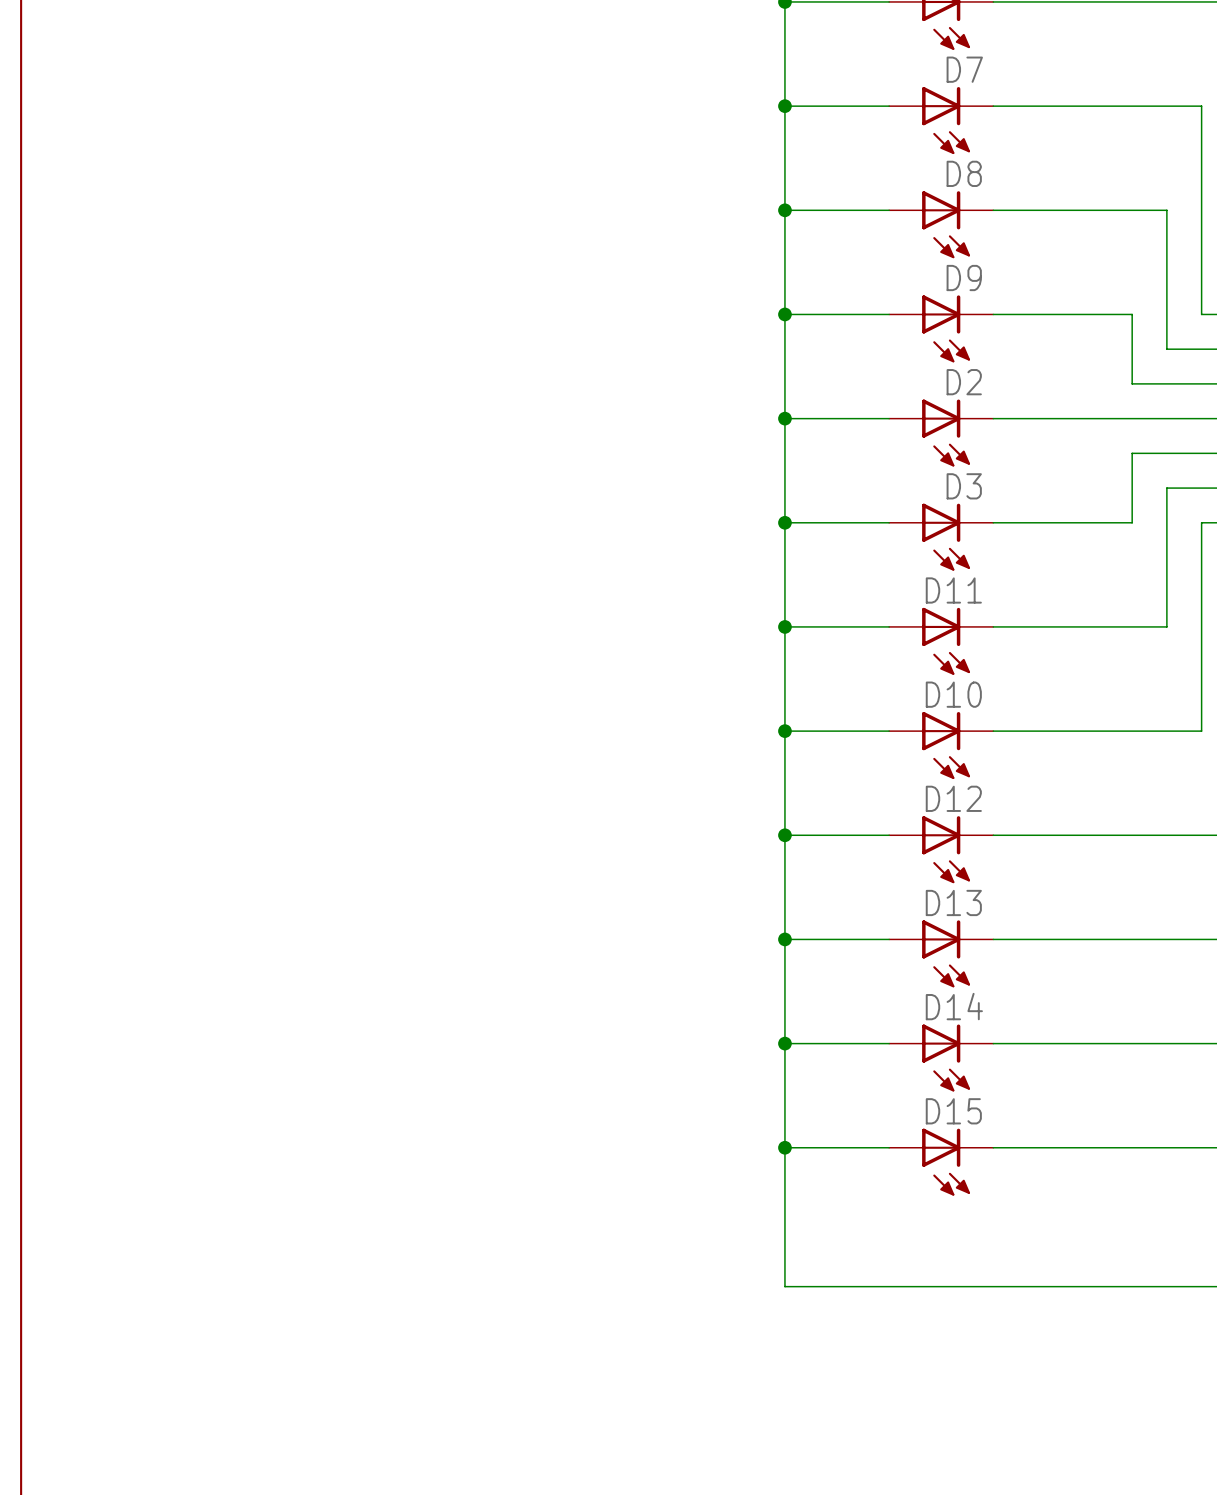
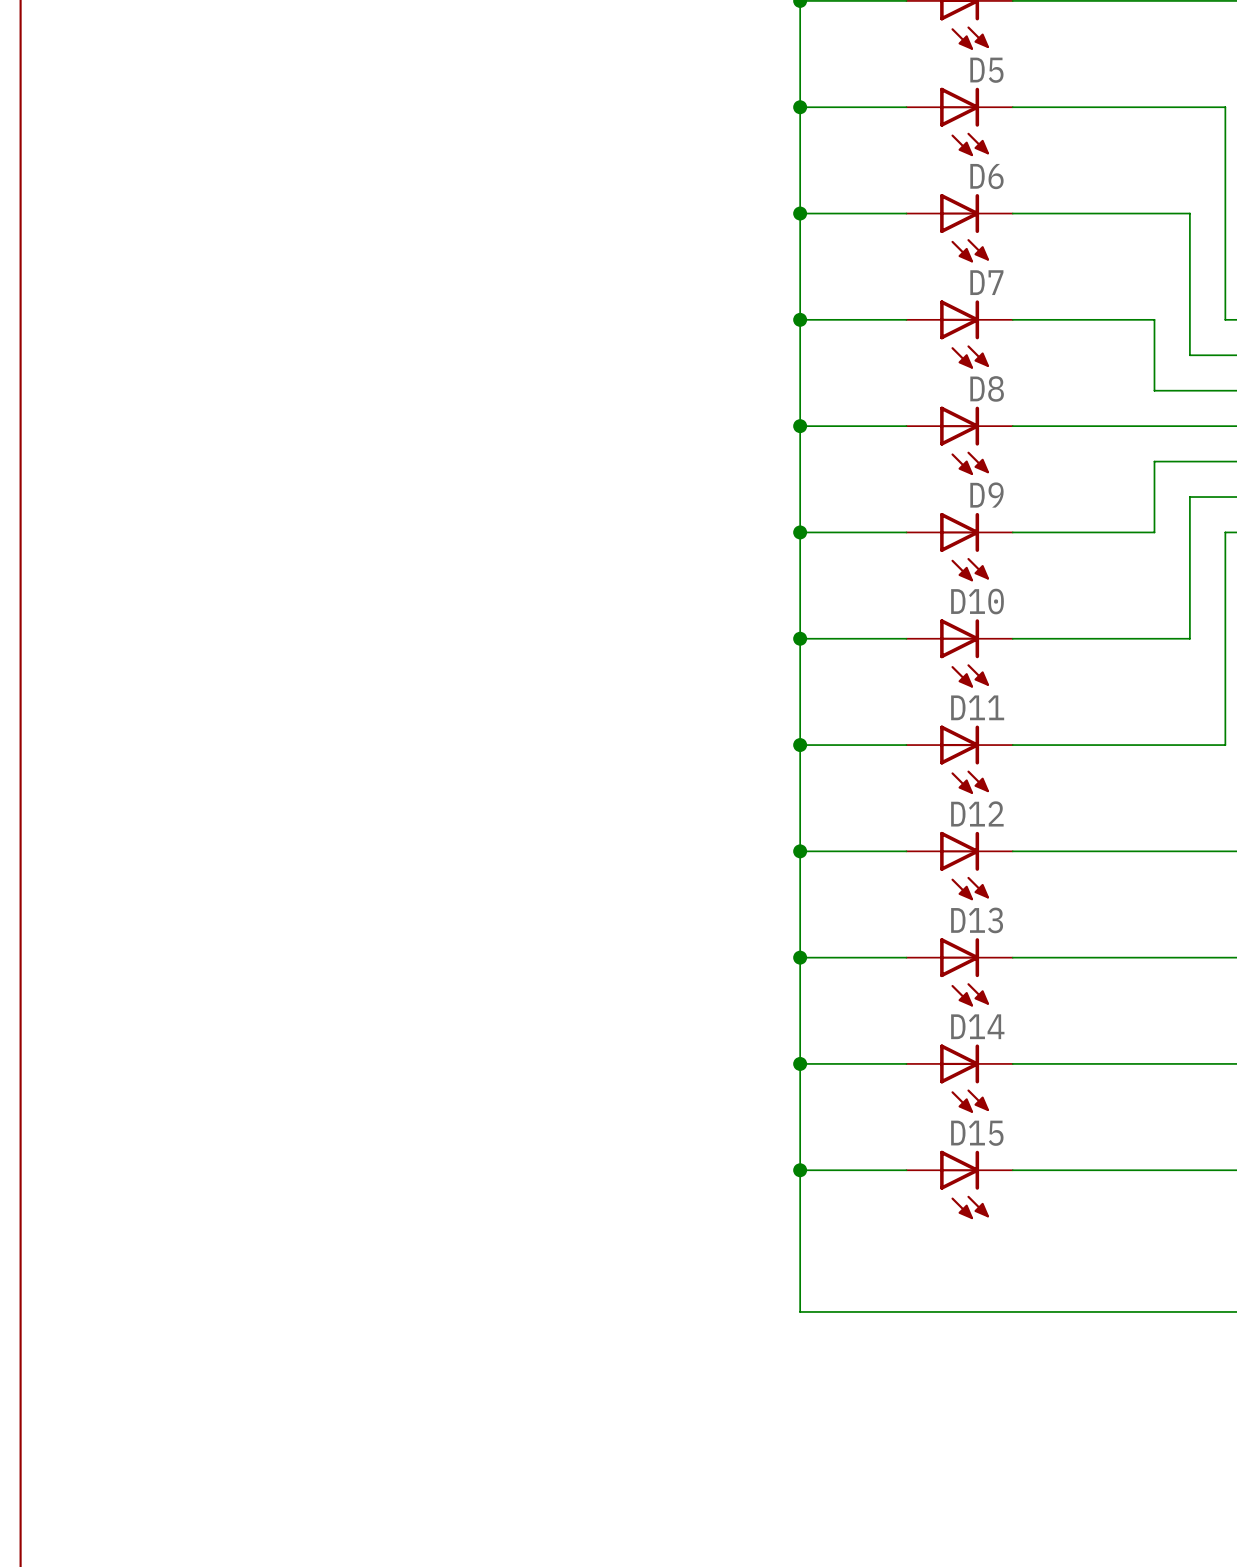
D7 name: D7 (964, 69) -> D5 (986, 70)
D8 name: D8 (964, 173) -> D6 (986, 176)
D9 name: D9 (964, 278) -> D7 (986, 282)
D2 name: D2 (964, 382) -> D8 (987, 388)
D3 name: D3 (964, 486) -> D9 (986, 495)
D11 name: D11 (953, 590) -> D10 (977, 601)
D10 name: D10 (953, 694) -> D11 (977, 707)

